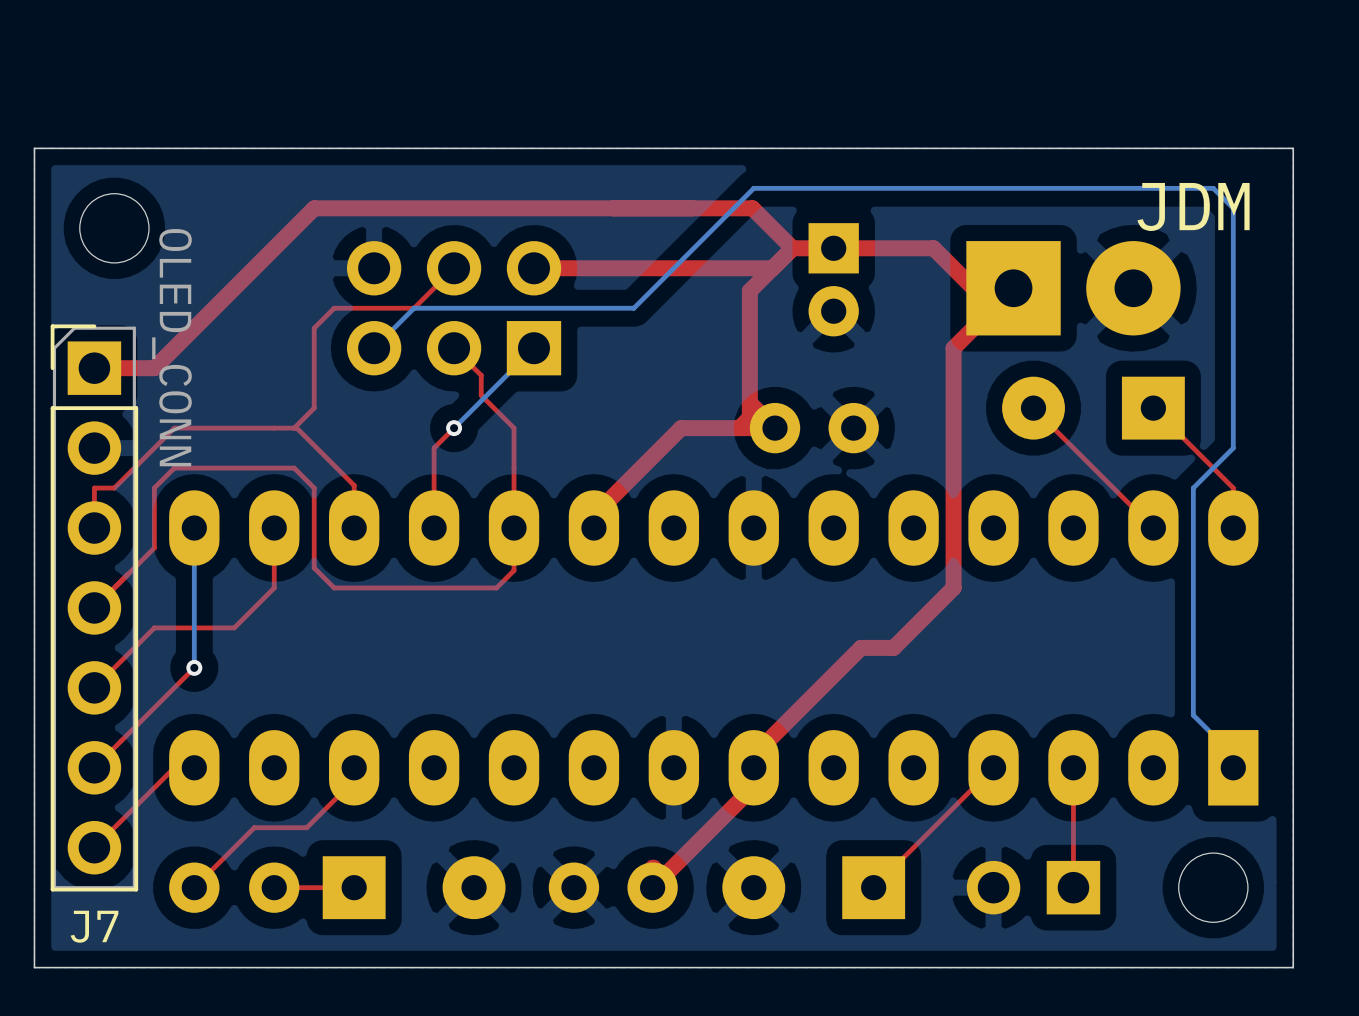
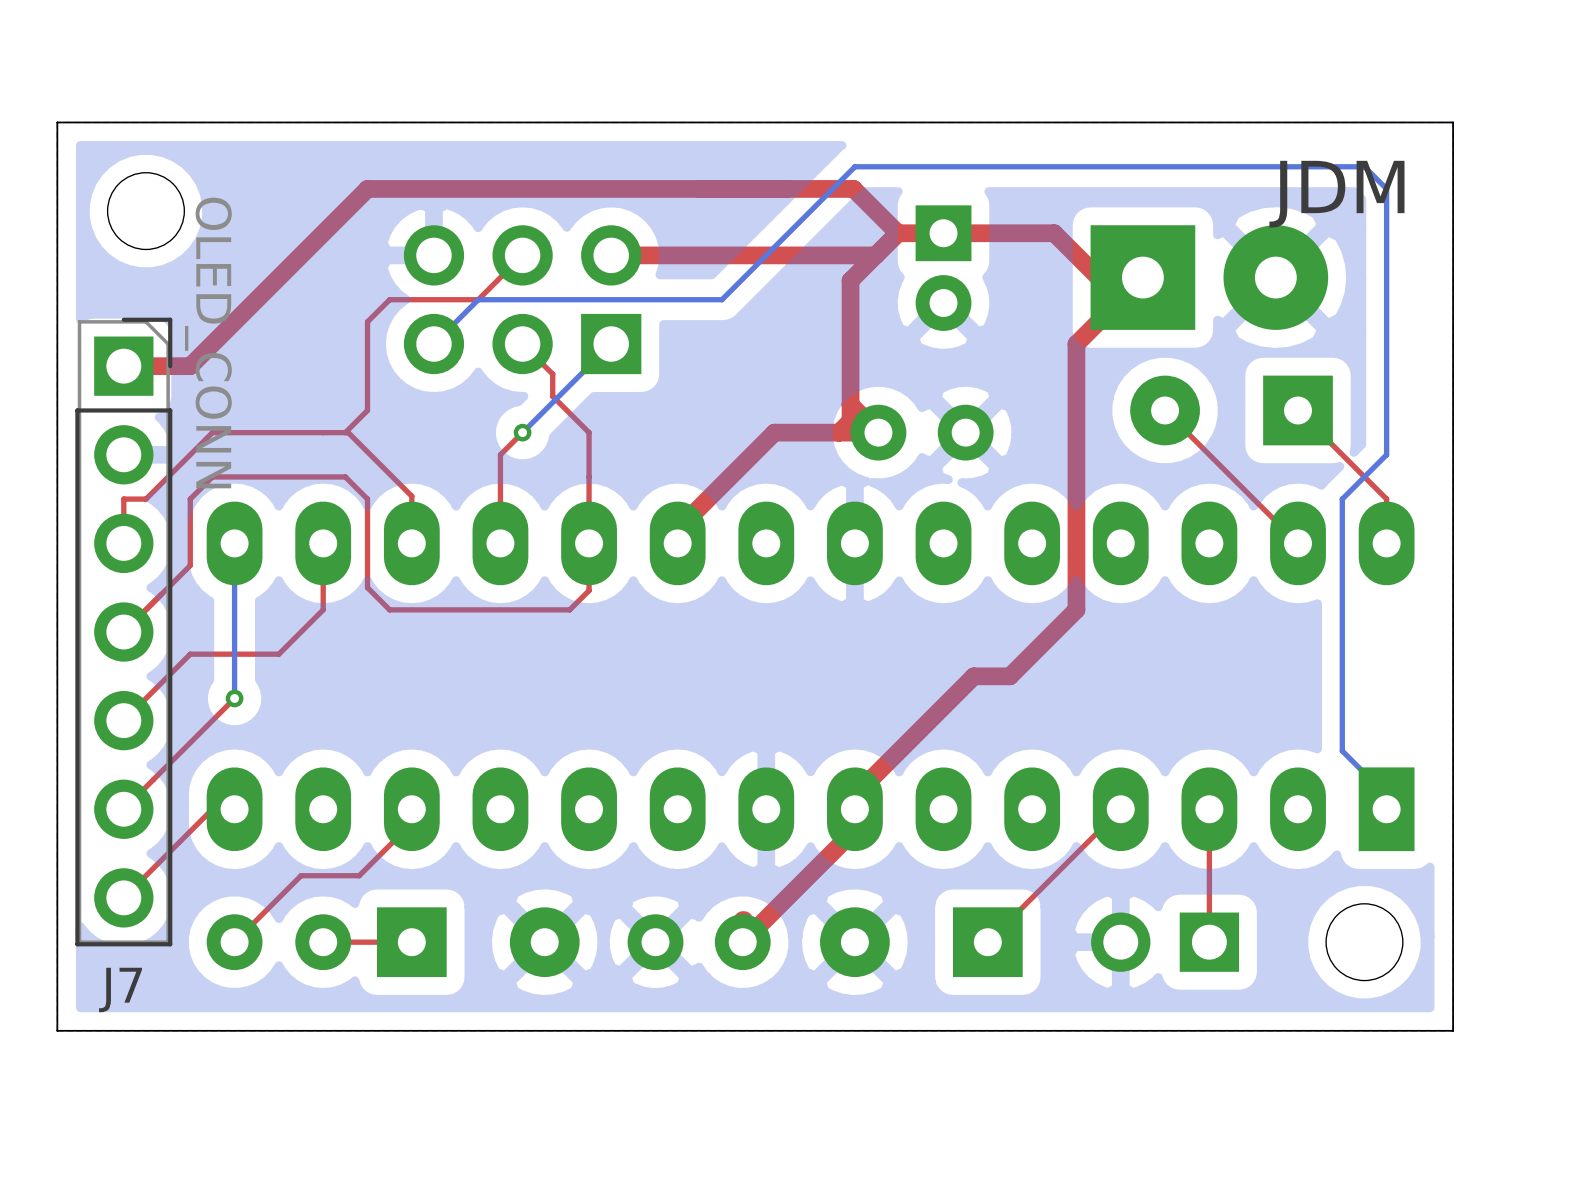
J7 footprint: [50, 324, 139, 892] -> [75, 317, 173, 947]

